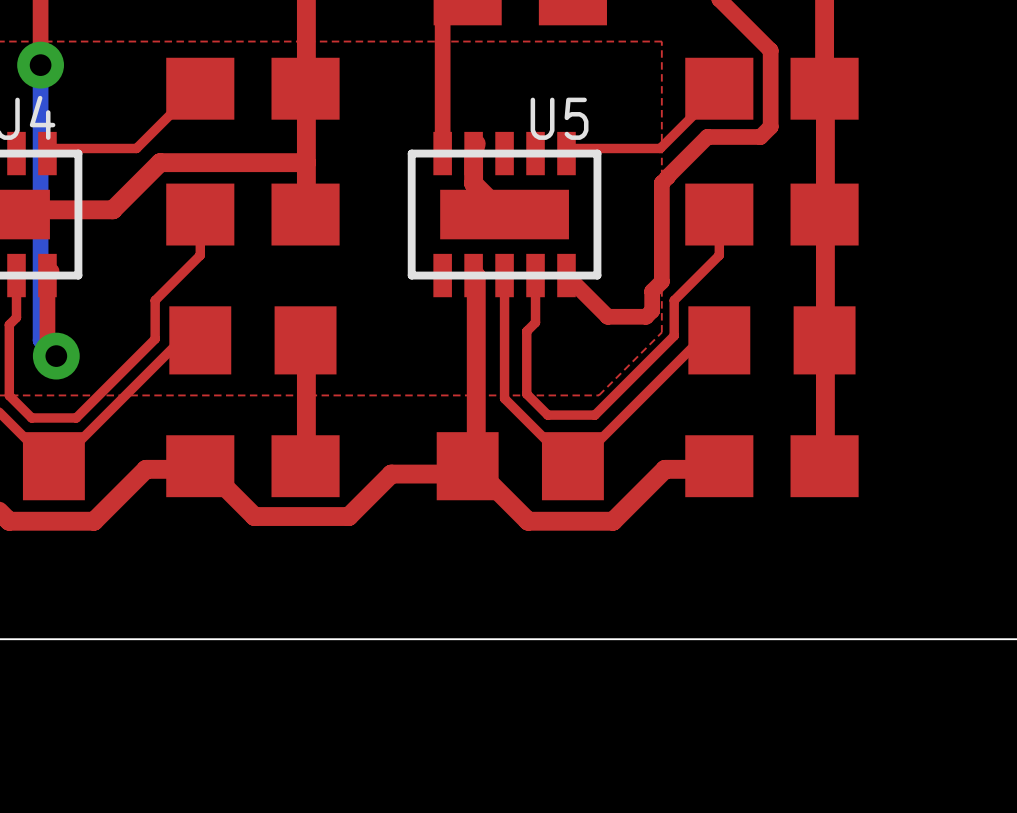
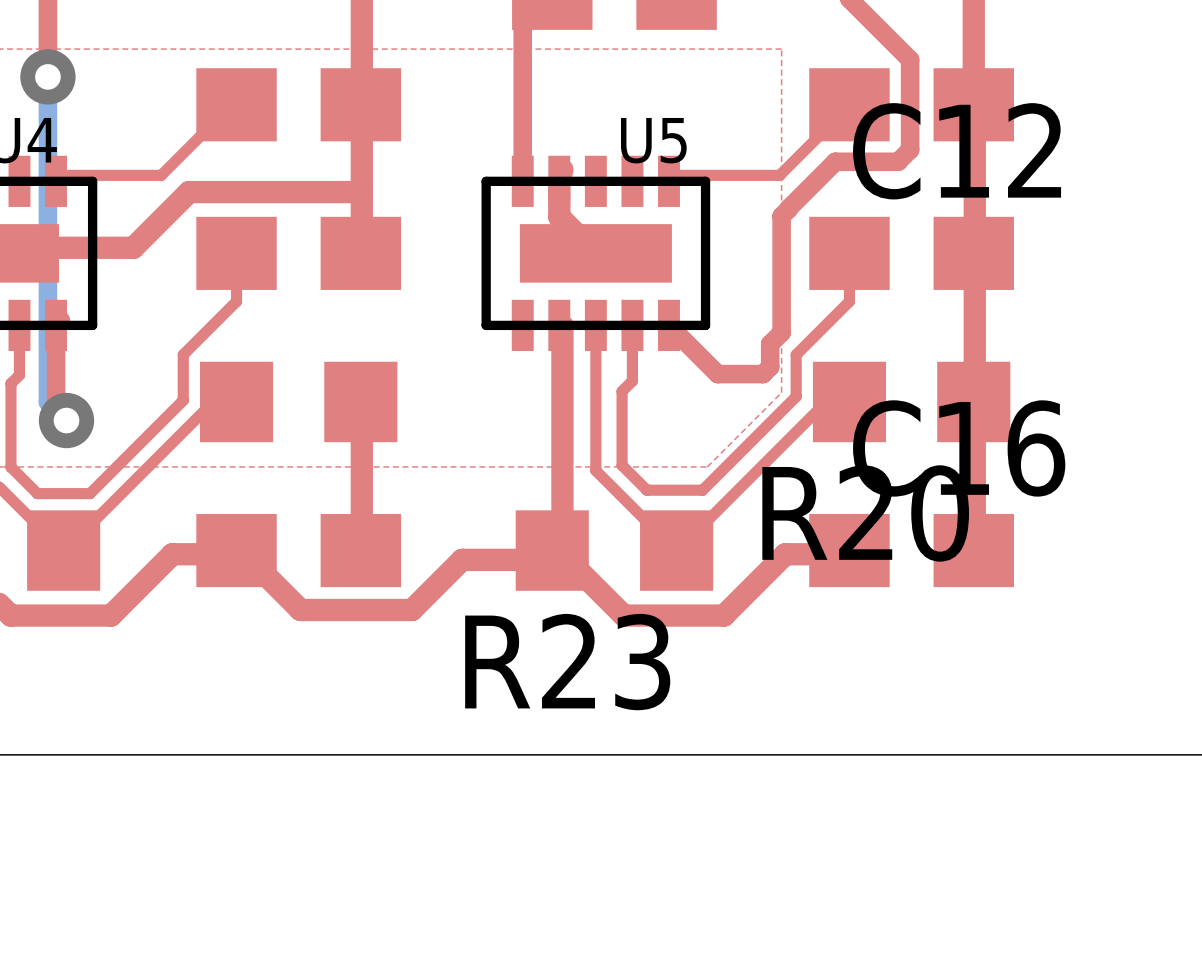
C12 name: none -> C12 (957, 151)
C16 name: none -> C16 (959, 448)
R20 name: none -> R20 (865, 513)
R23 name: none -> R23 (567, 662)

